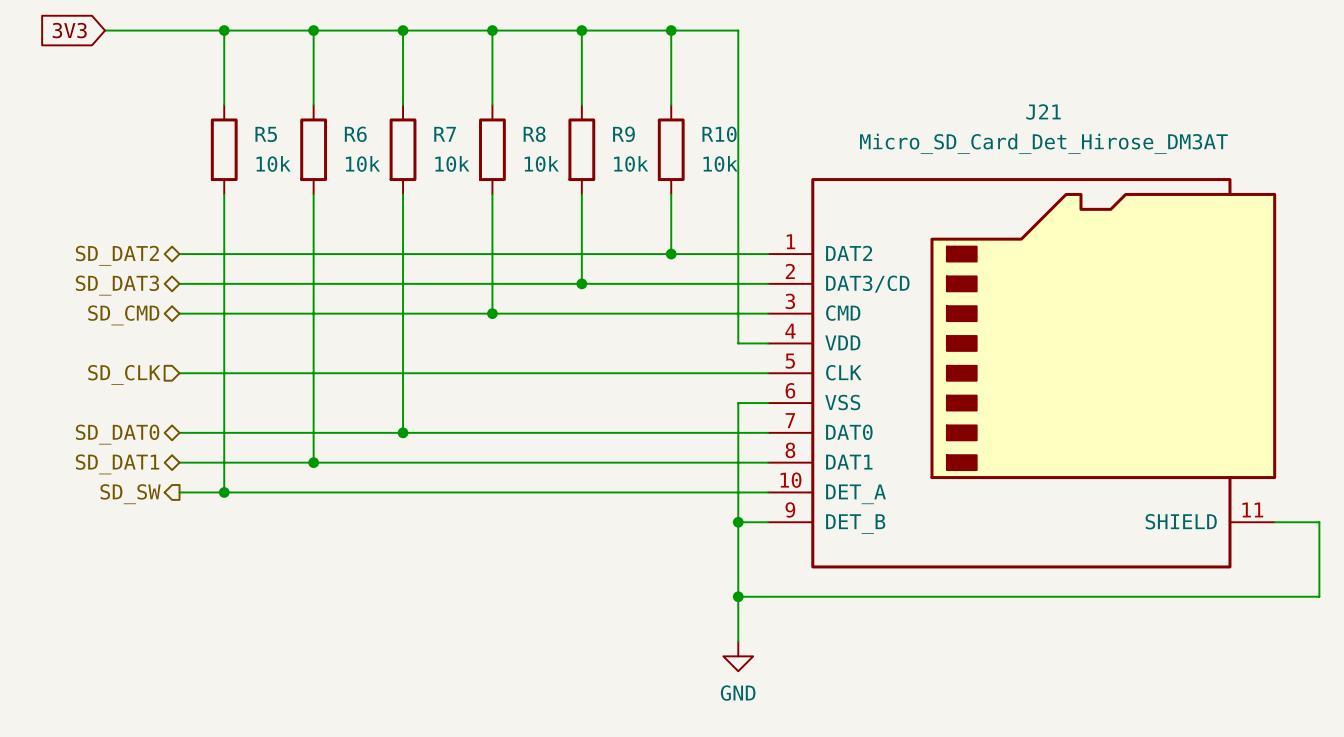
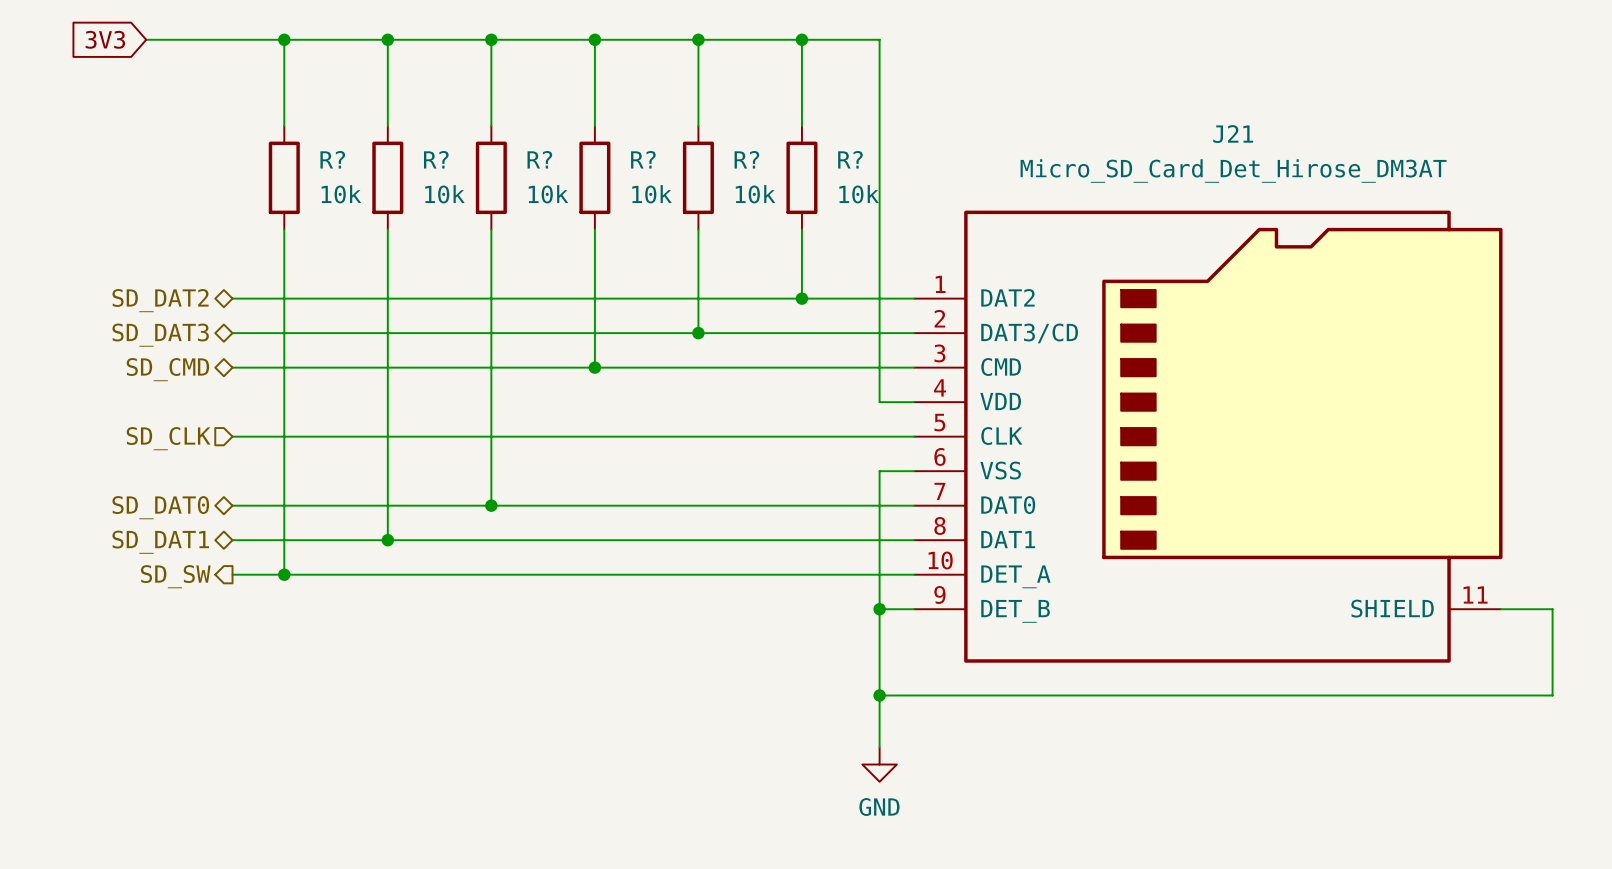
R5 name: R5 (266, 134) -> R? (332, 159)
R6 name: R6 (355, 134) -> R? (436, 159)
R7 name: R7 (445, 134) -> R? (539, 159)
R8 name: R8 (534, 134) -> R? (643, 159)
R9 name: R9 (623, 134) -> R? (746, 159)
R10 name: R10 (719, 134) -> R? (850, 159)

